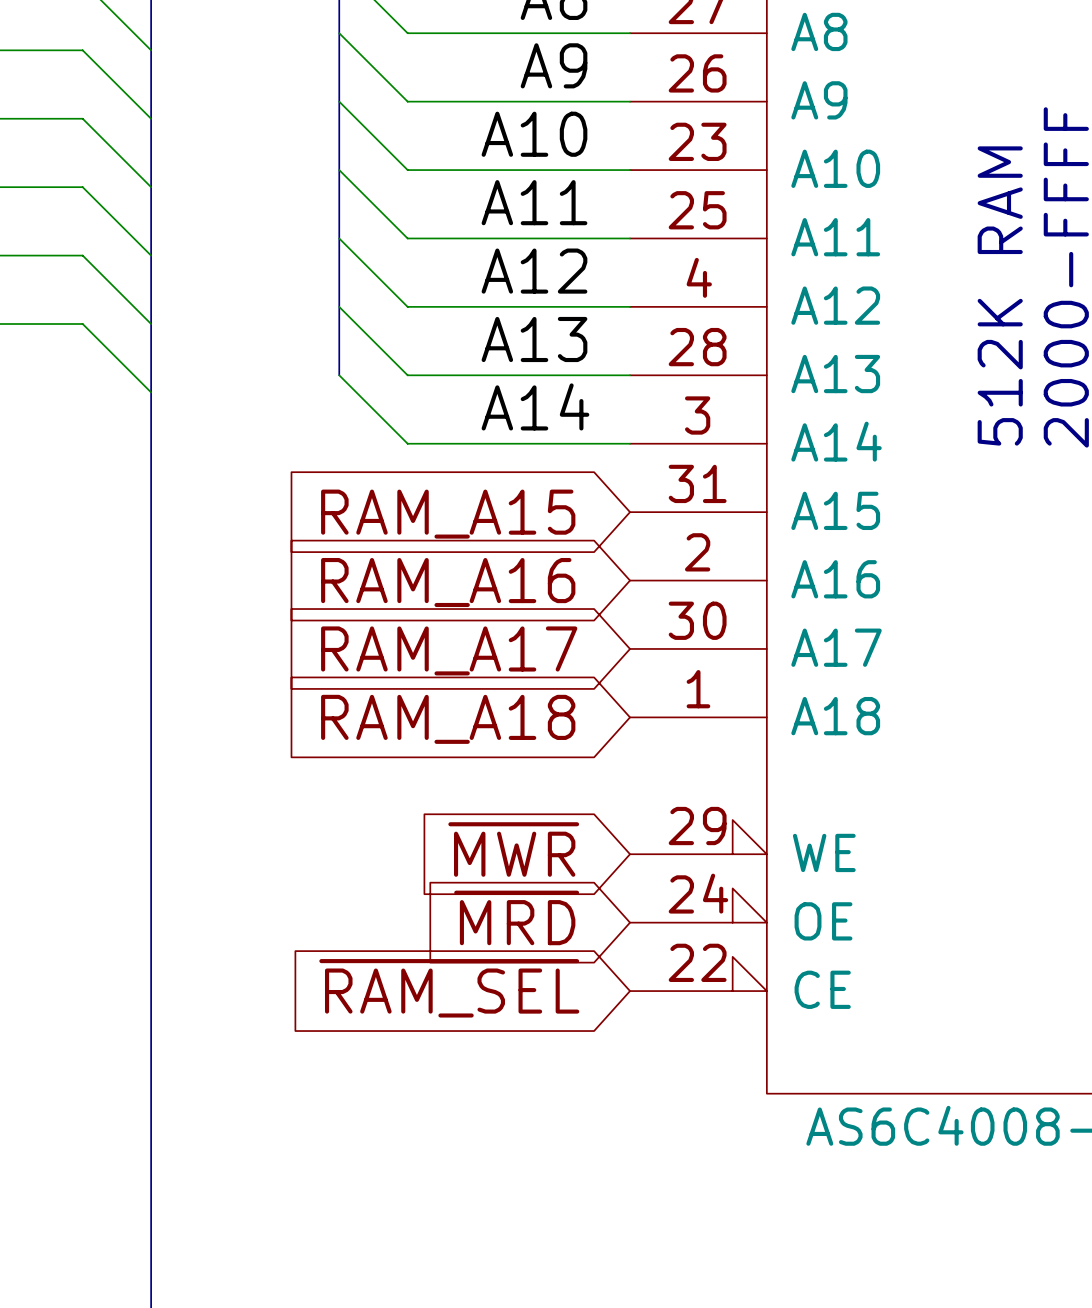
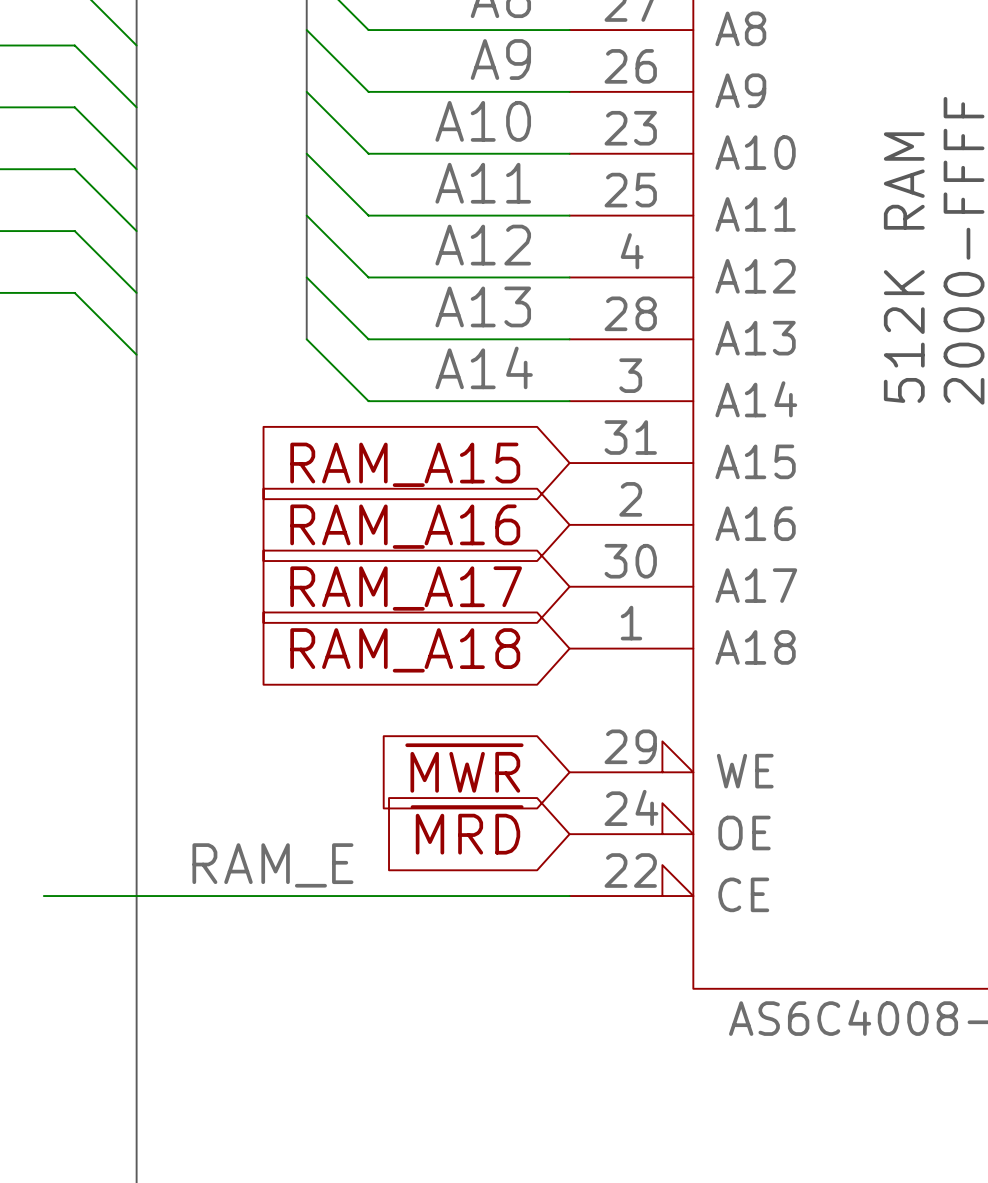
label: none -> RAM_E (272, 865)
global label: ~{RAM_SEL} (449, 988) -> none
wire: none -> (43, 896) (569, 896)

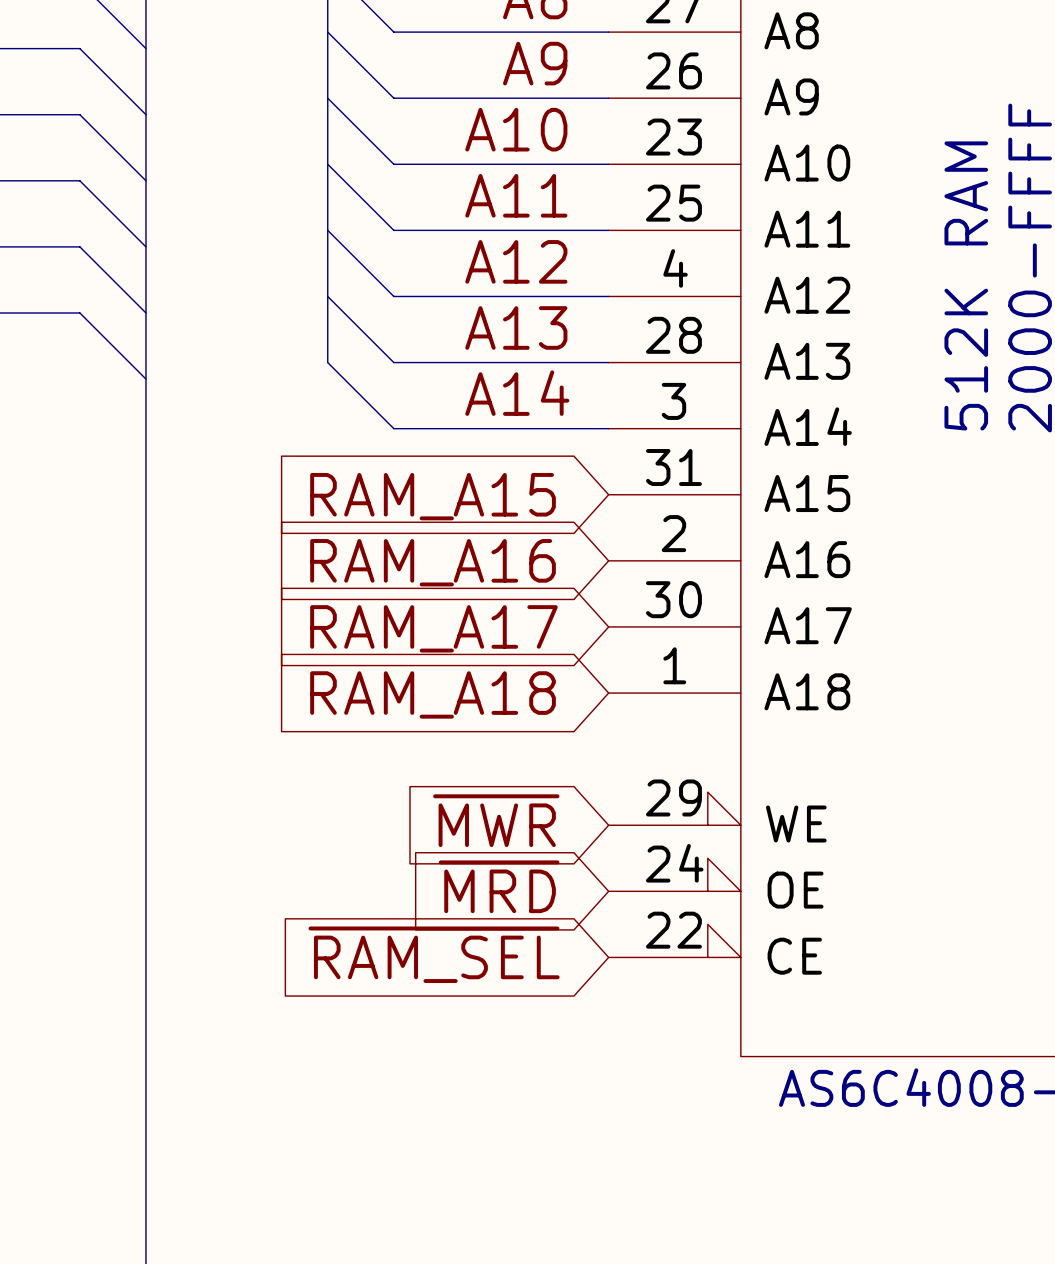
label: RAM_E (272, 865) -> none
global label: none -> ~{RAM_SEL} (434, 954)
wire: (43, 896) (569, 896) -> none

